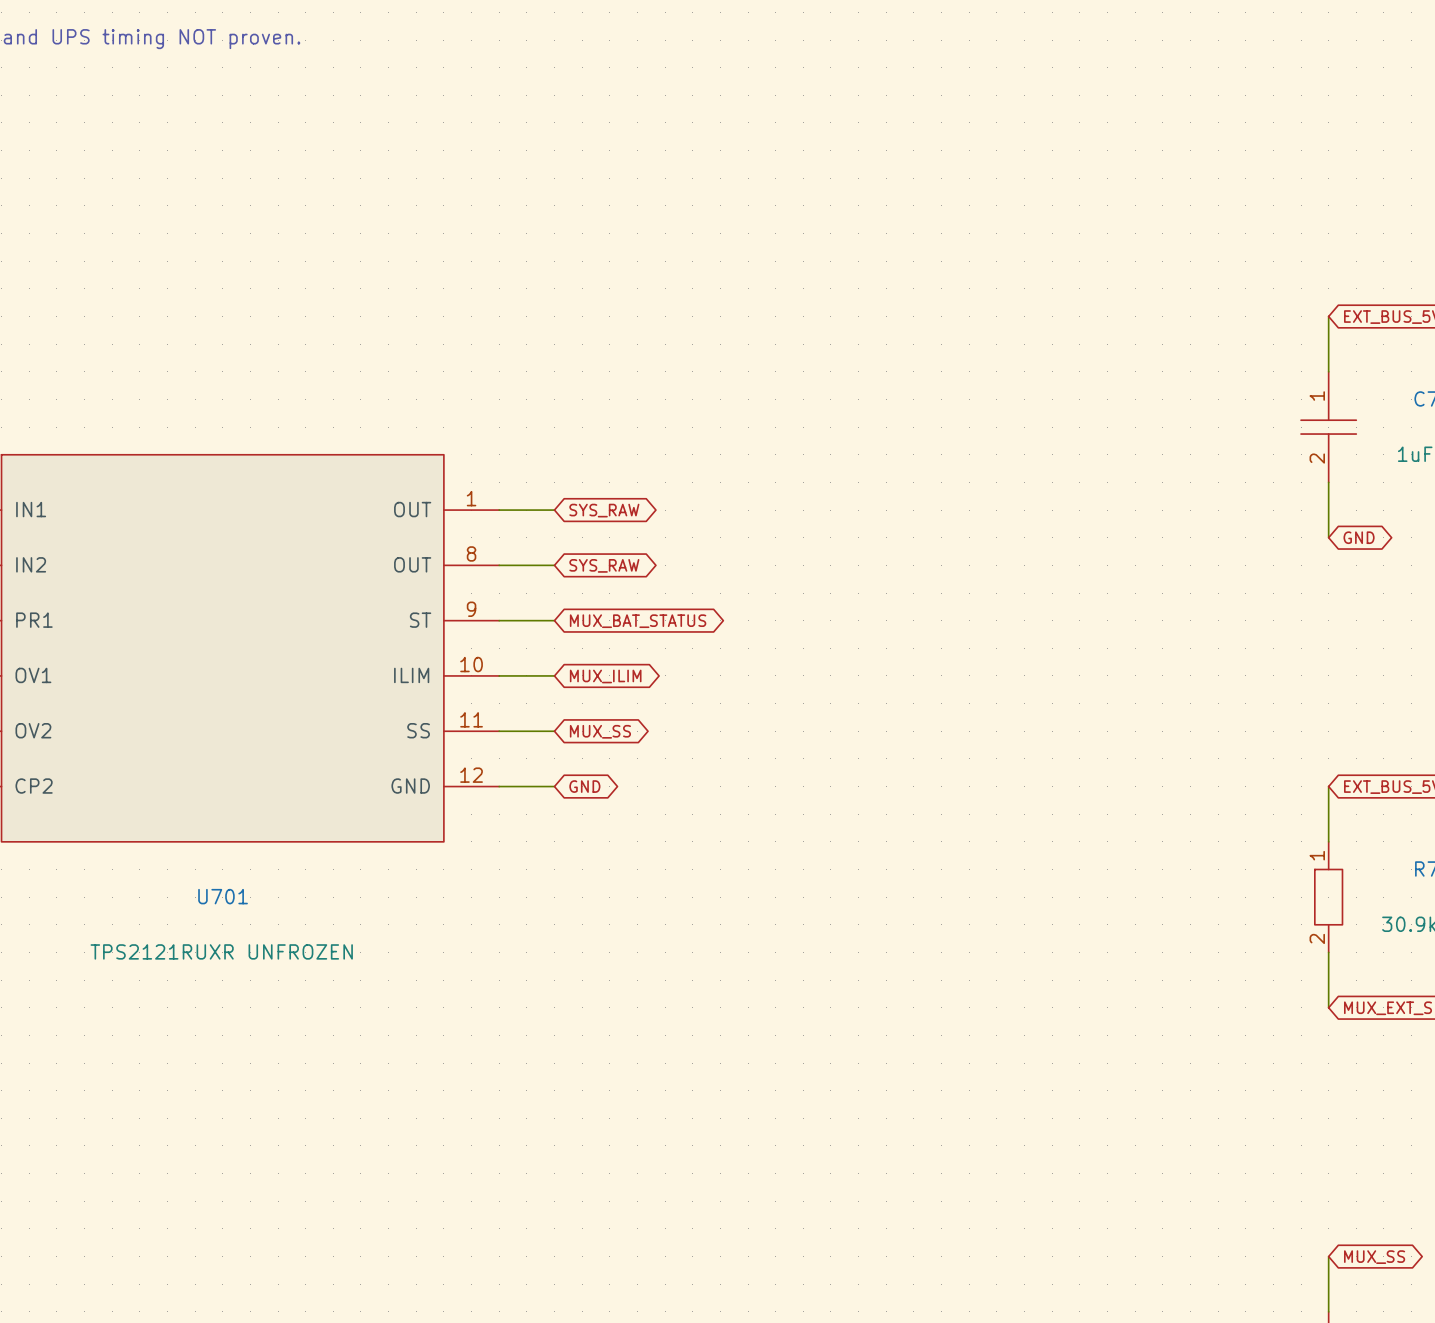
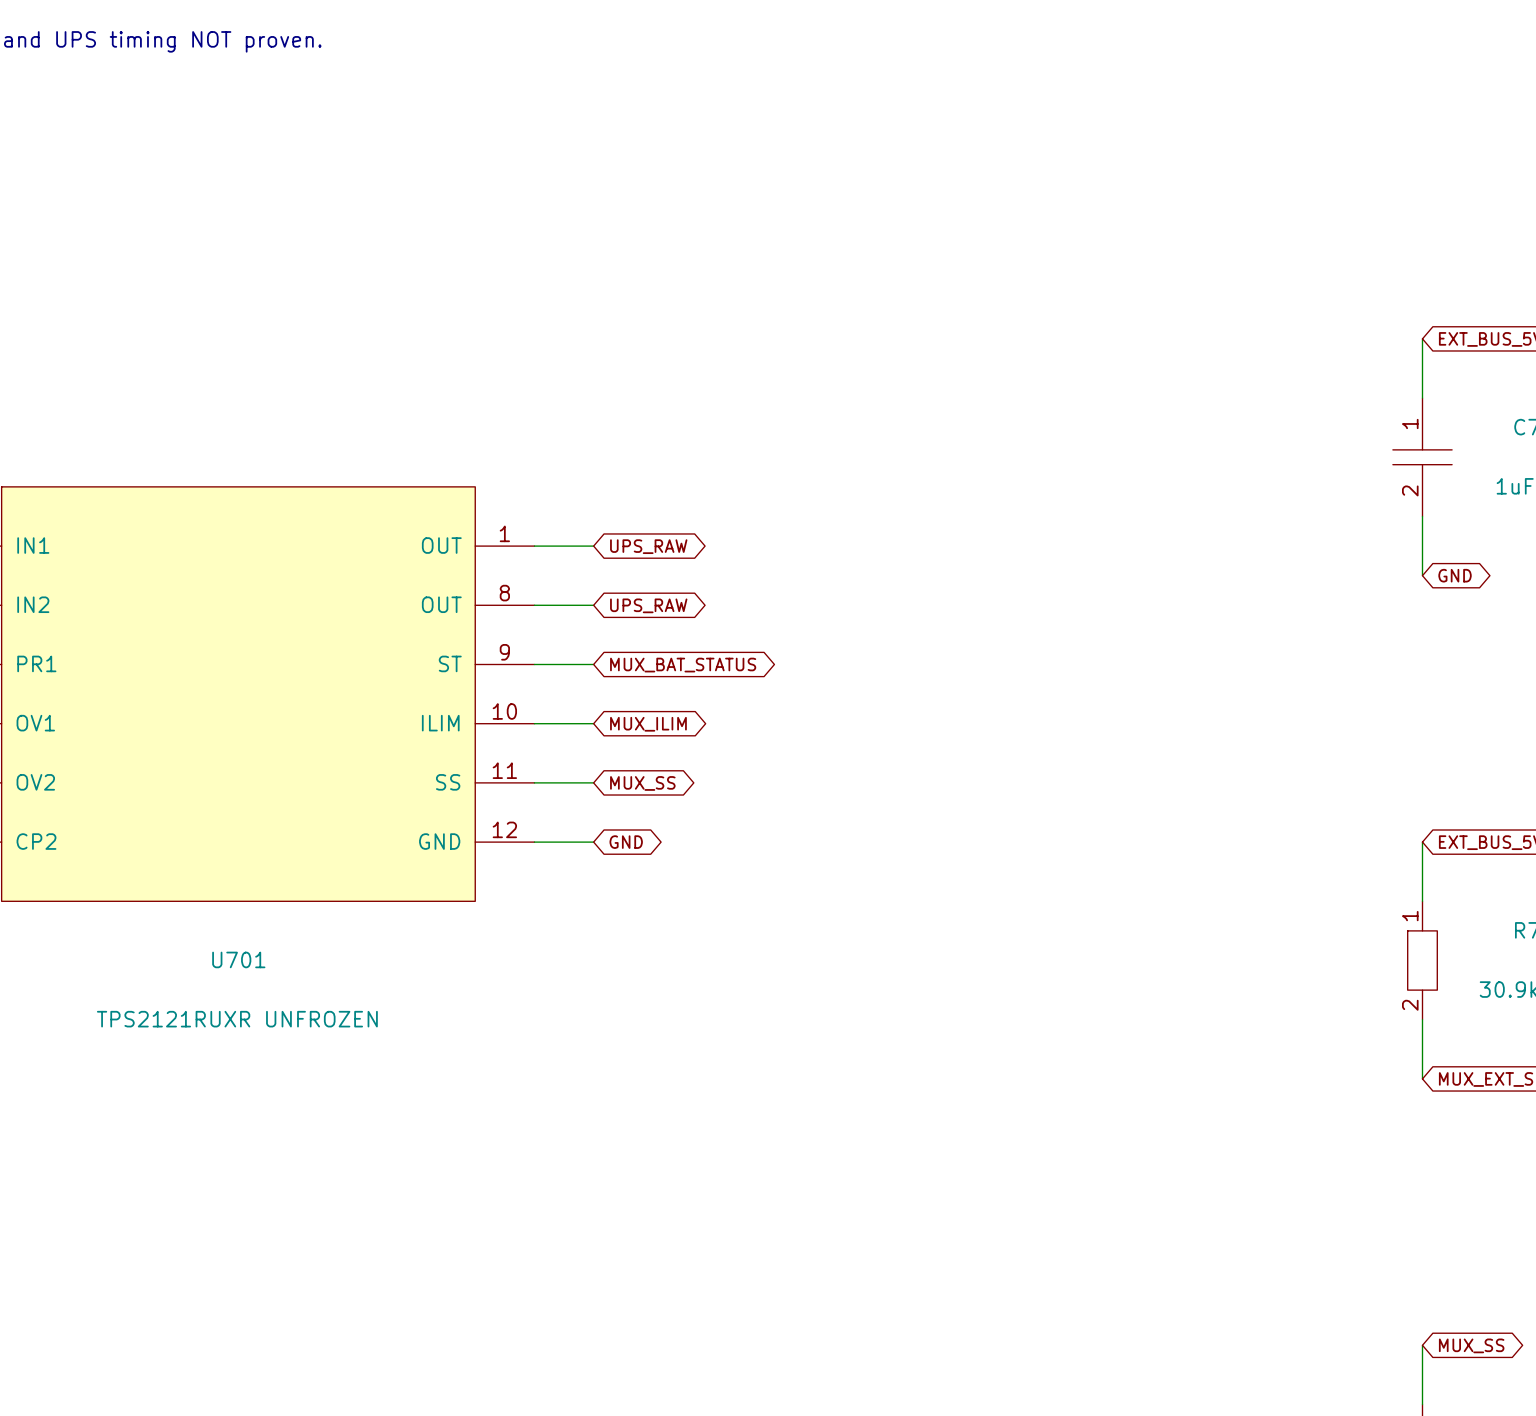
global label: SYS_RAW (604, 510) -> UPS_RAW (648, 546)
global label: SYS_RAW (604, 565) -> UPS_RAW (648, 605)

